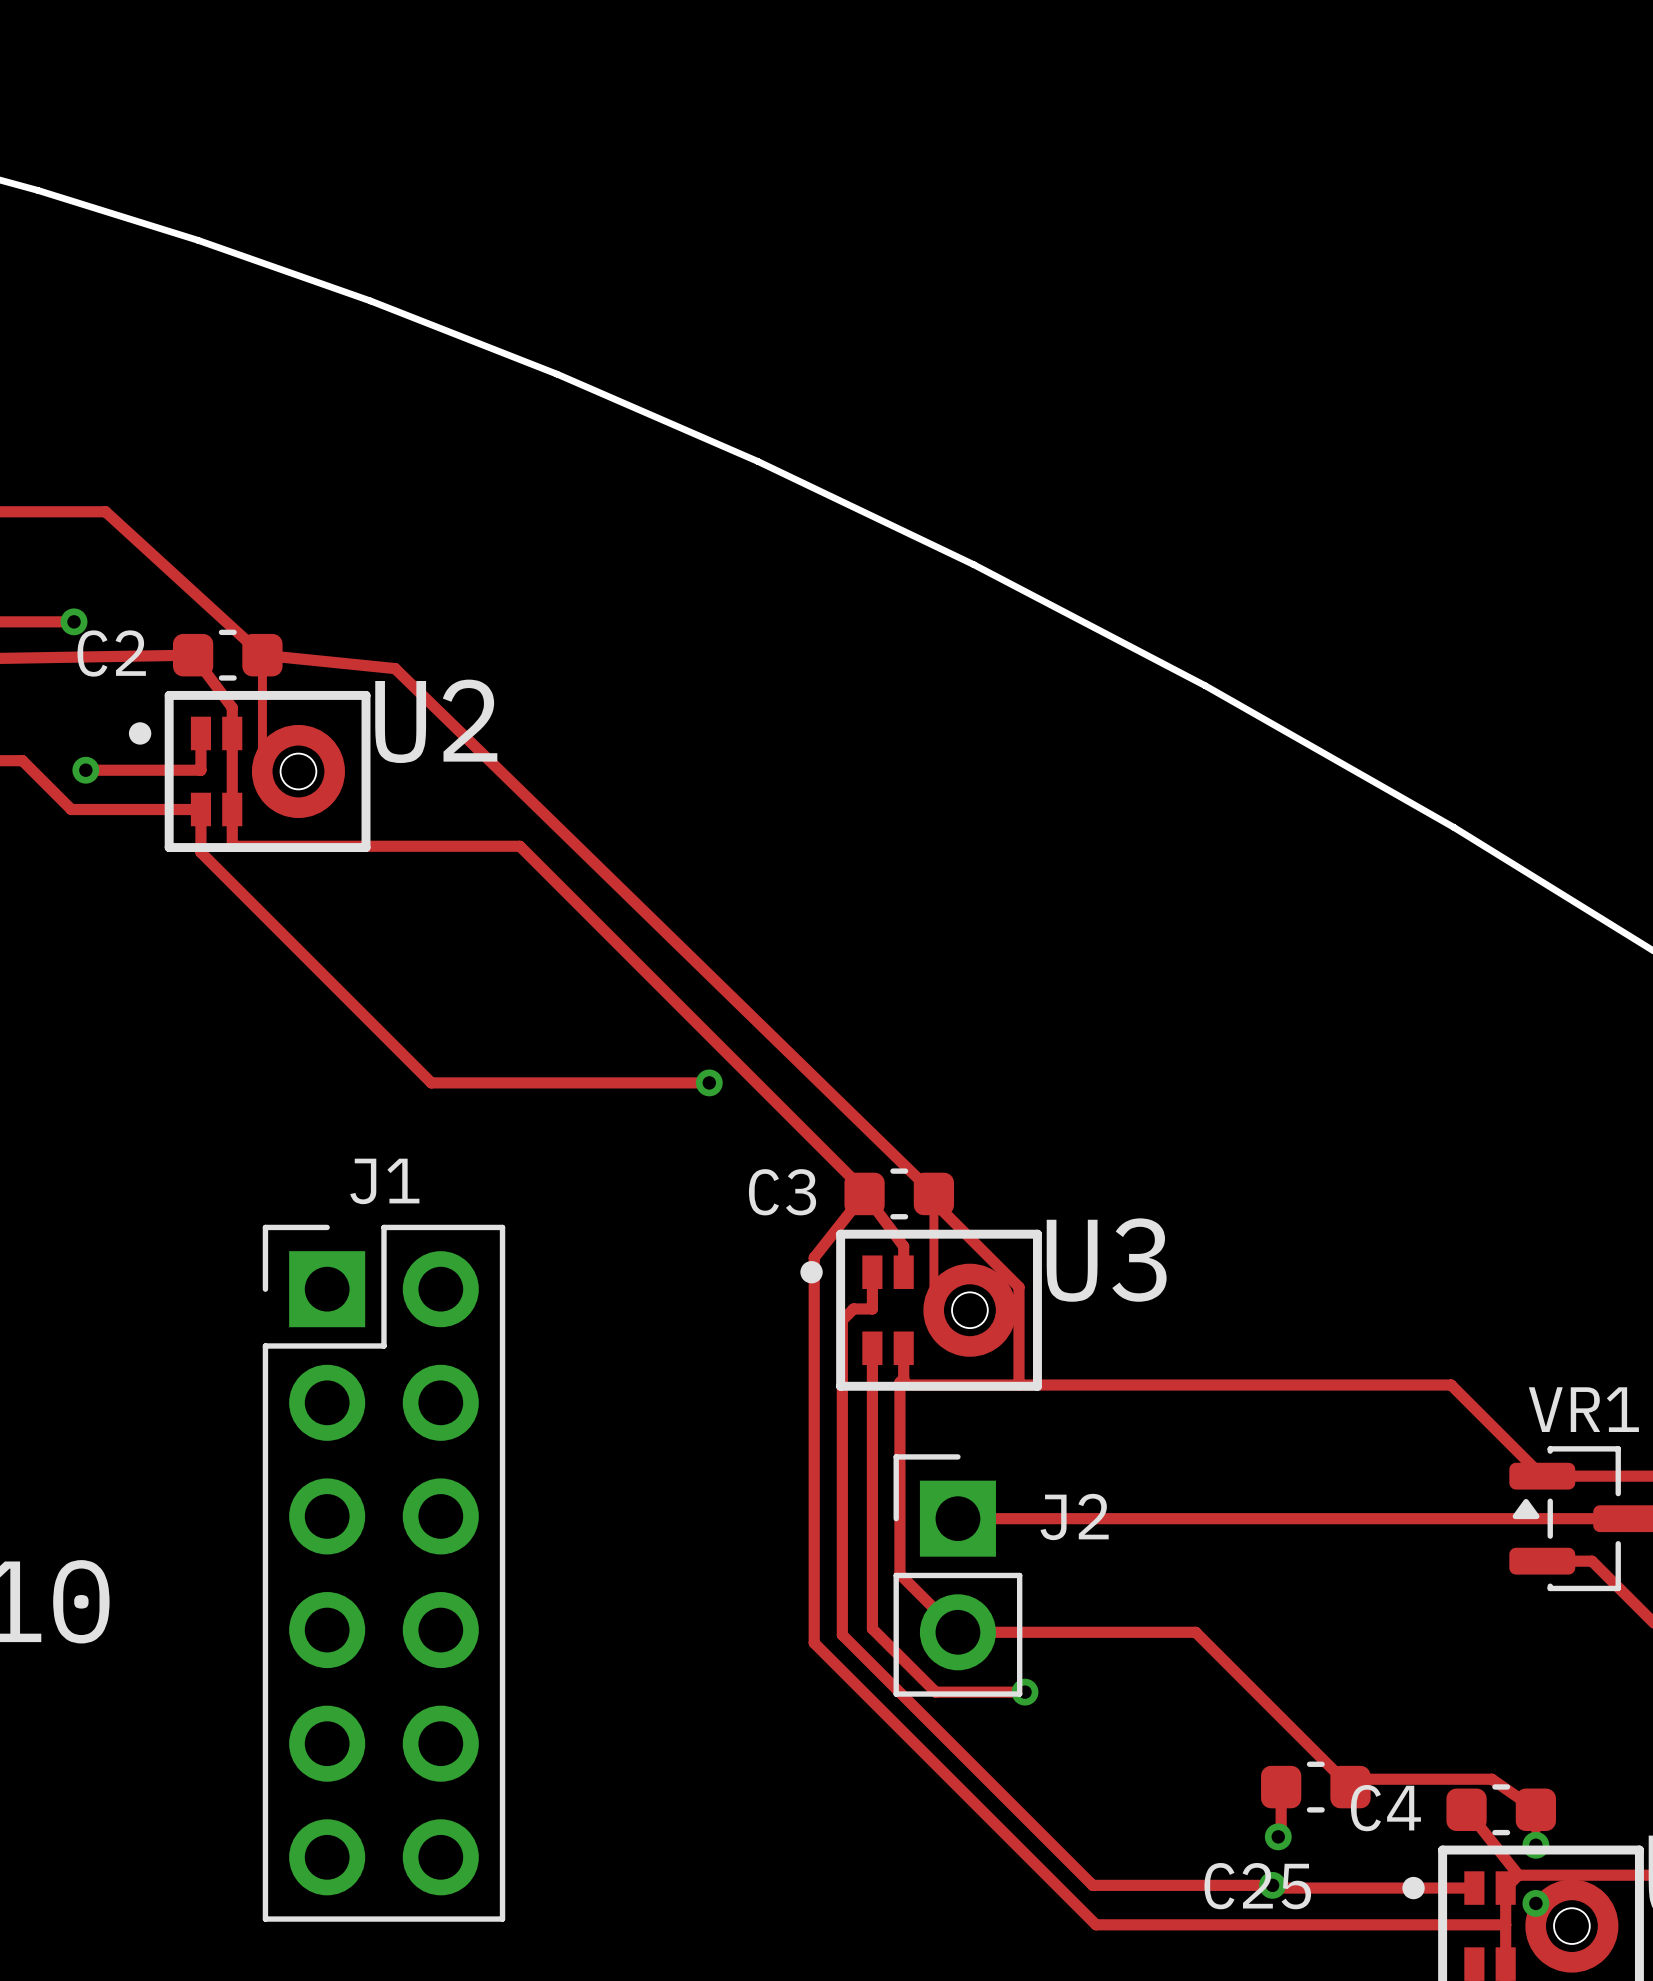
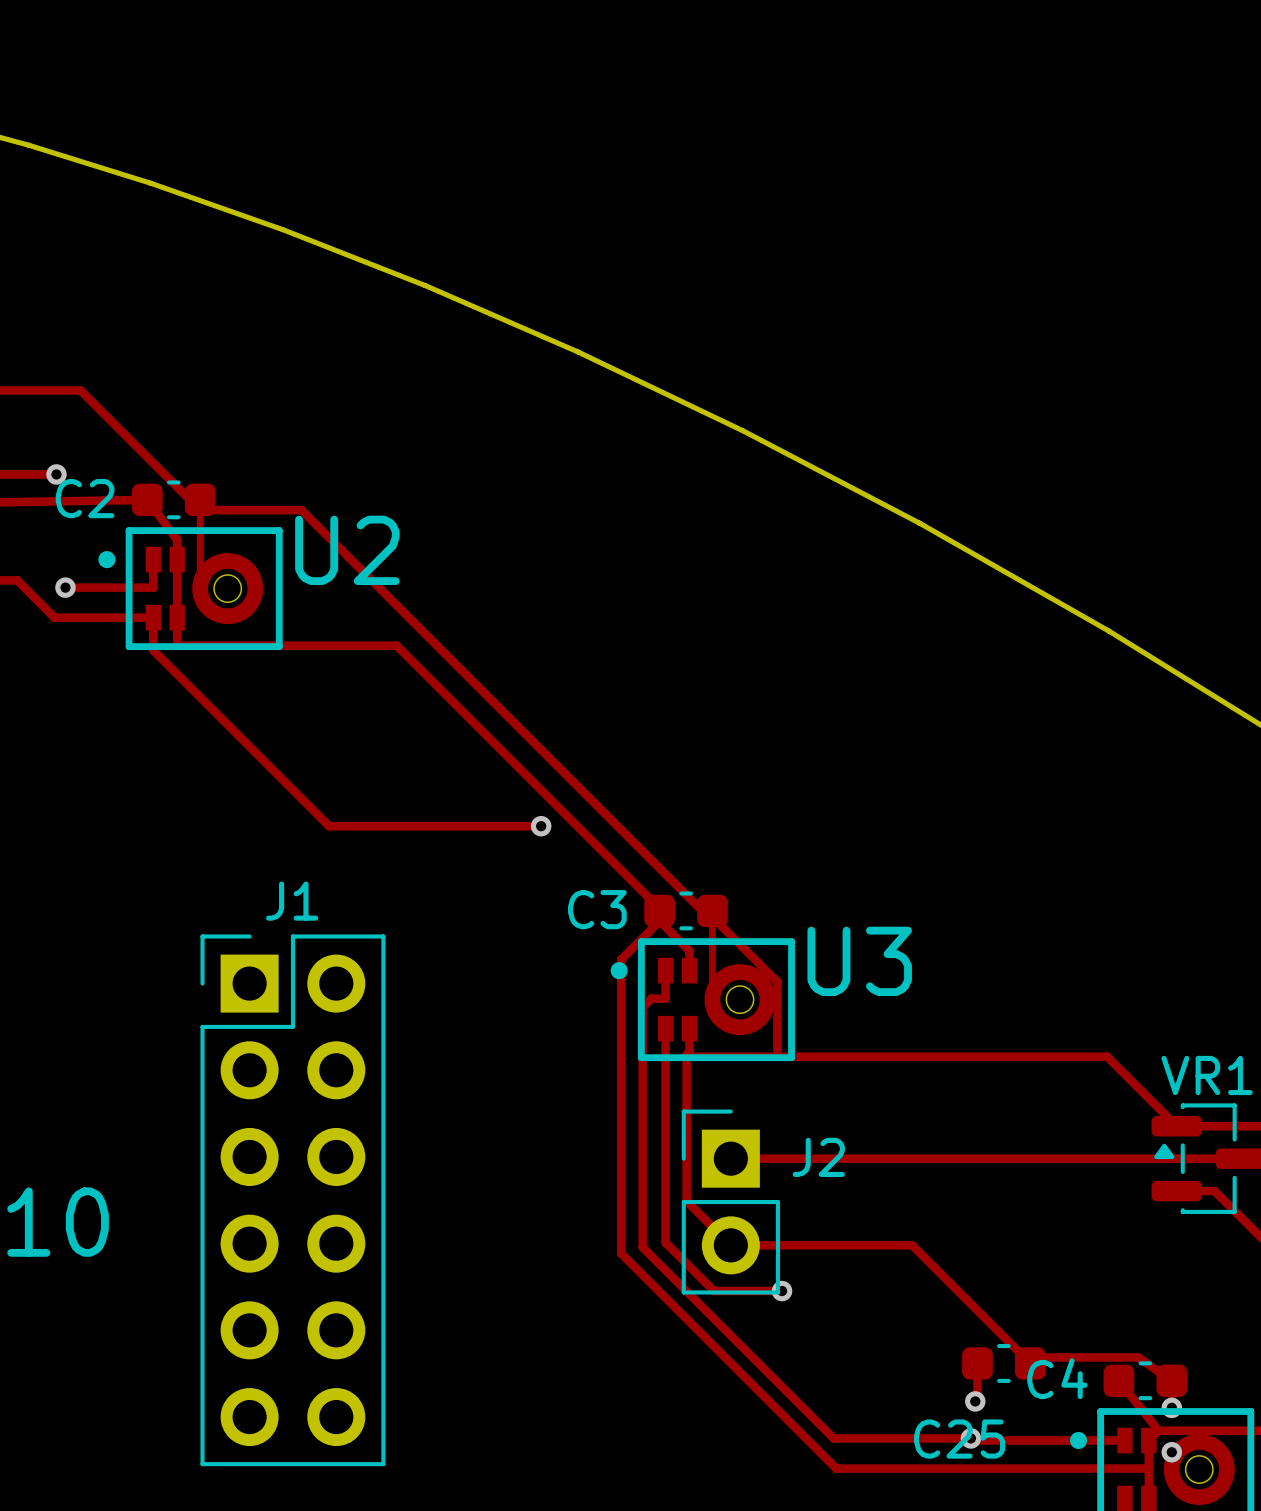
track: (105, 511) (262, 655) -> (80, 390) (200, 510) (301, 510) (712, 921) (716, 921)
track: (262, 655) (395, 668) (933, 1193) -> none
track: none -> (659, 921) (689, 951)
track: (903, 1246) (864, 1193) (814, 1257) -> (659, 921) (621, 959)

